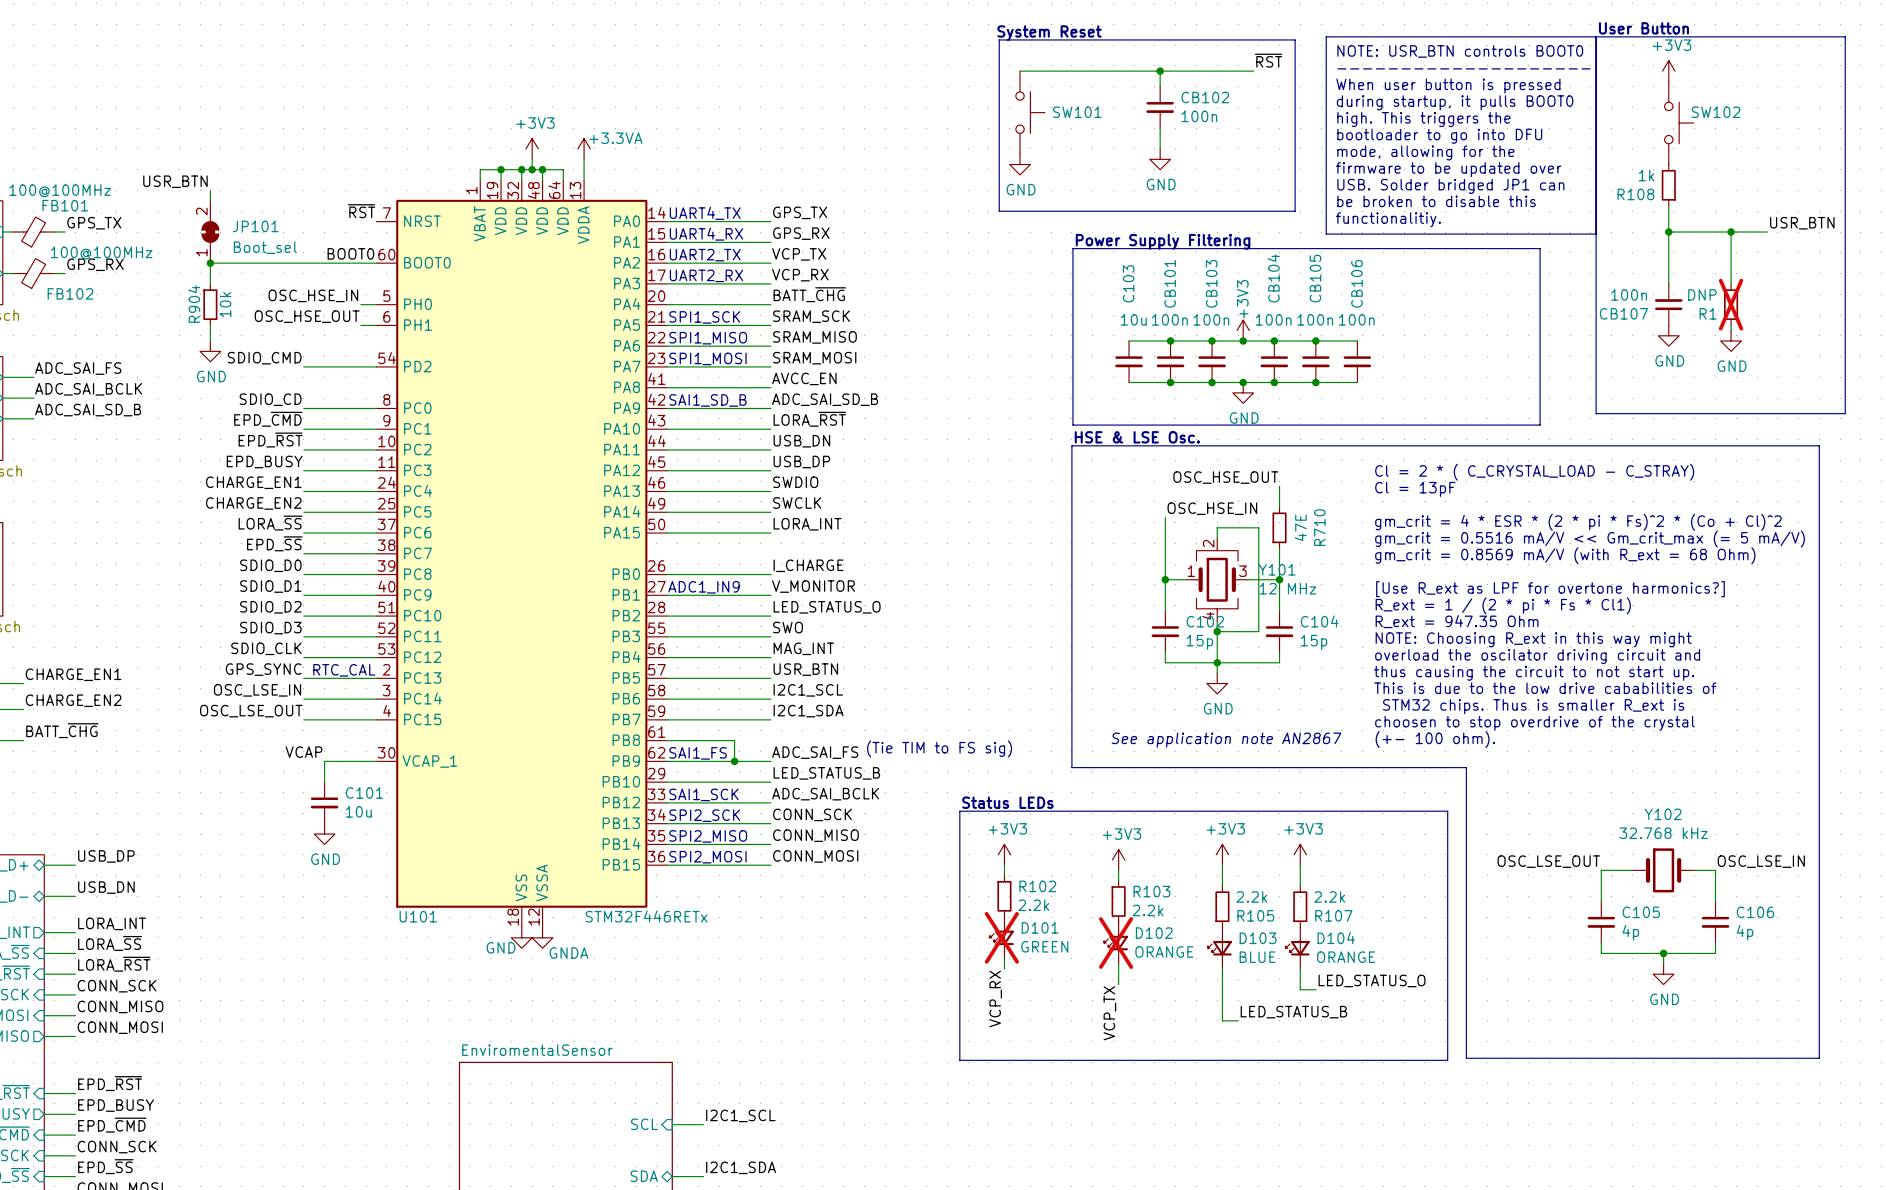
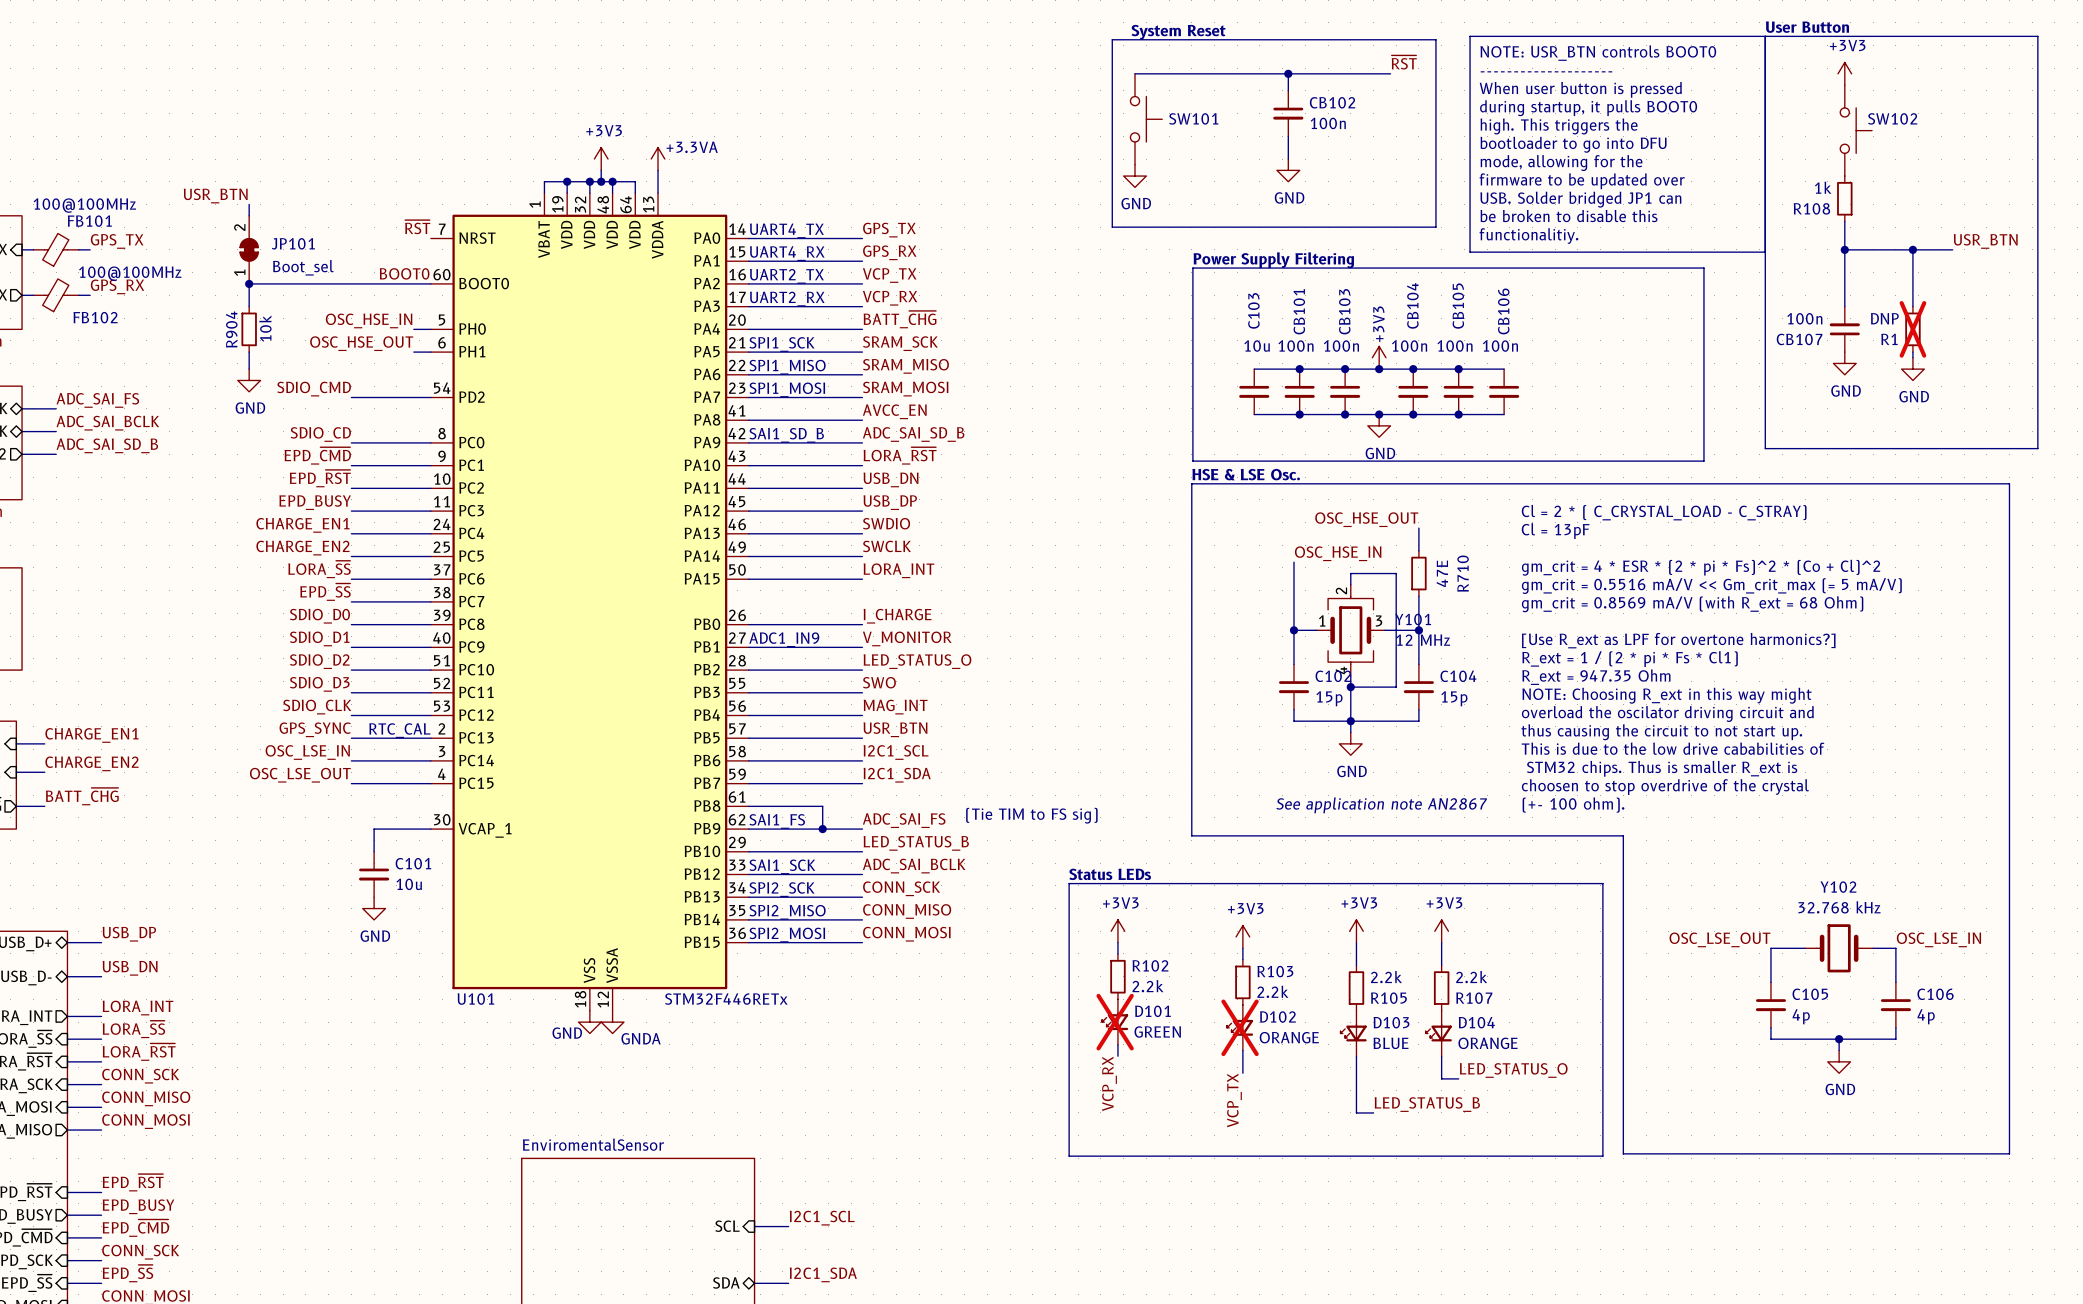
label: VCAP (303, 752) -> none

